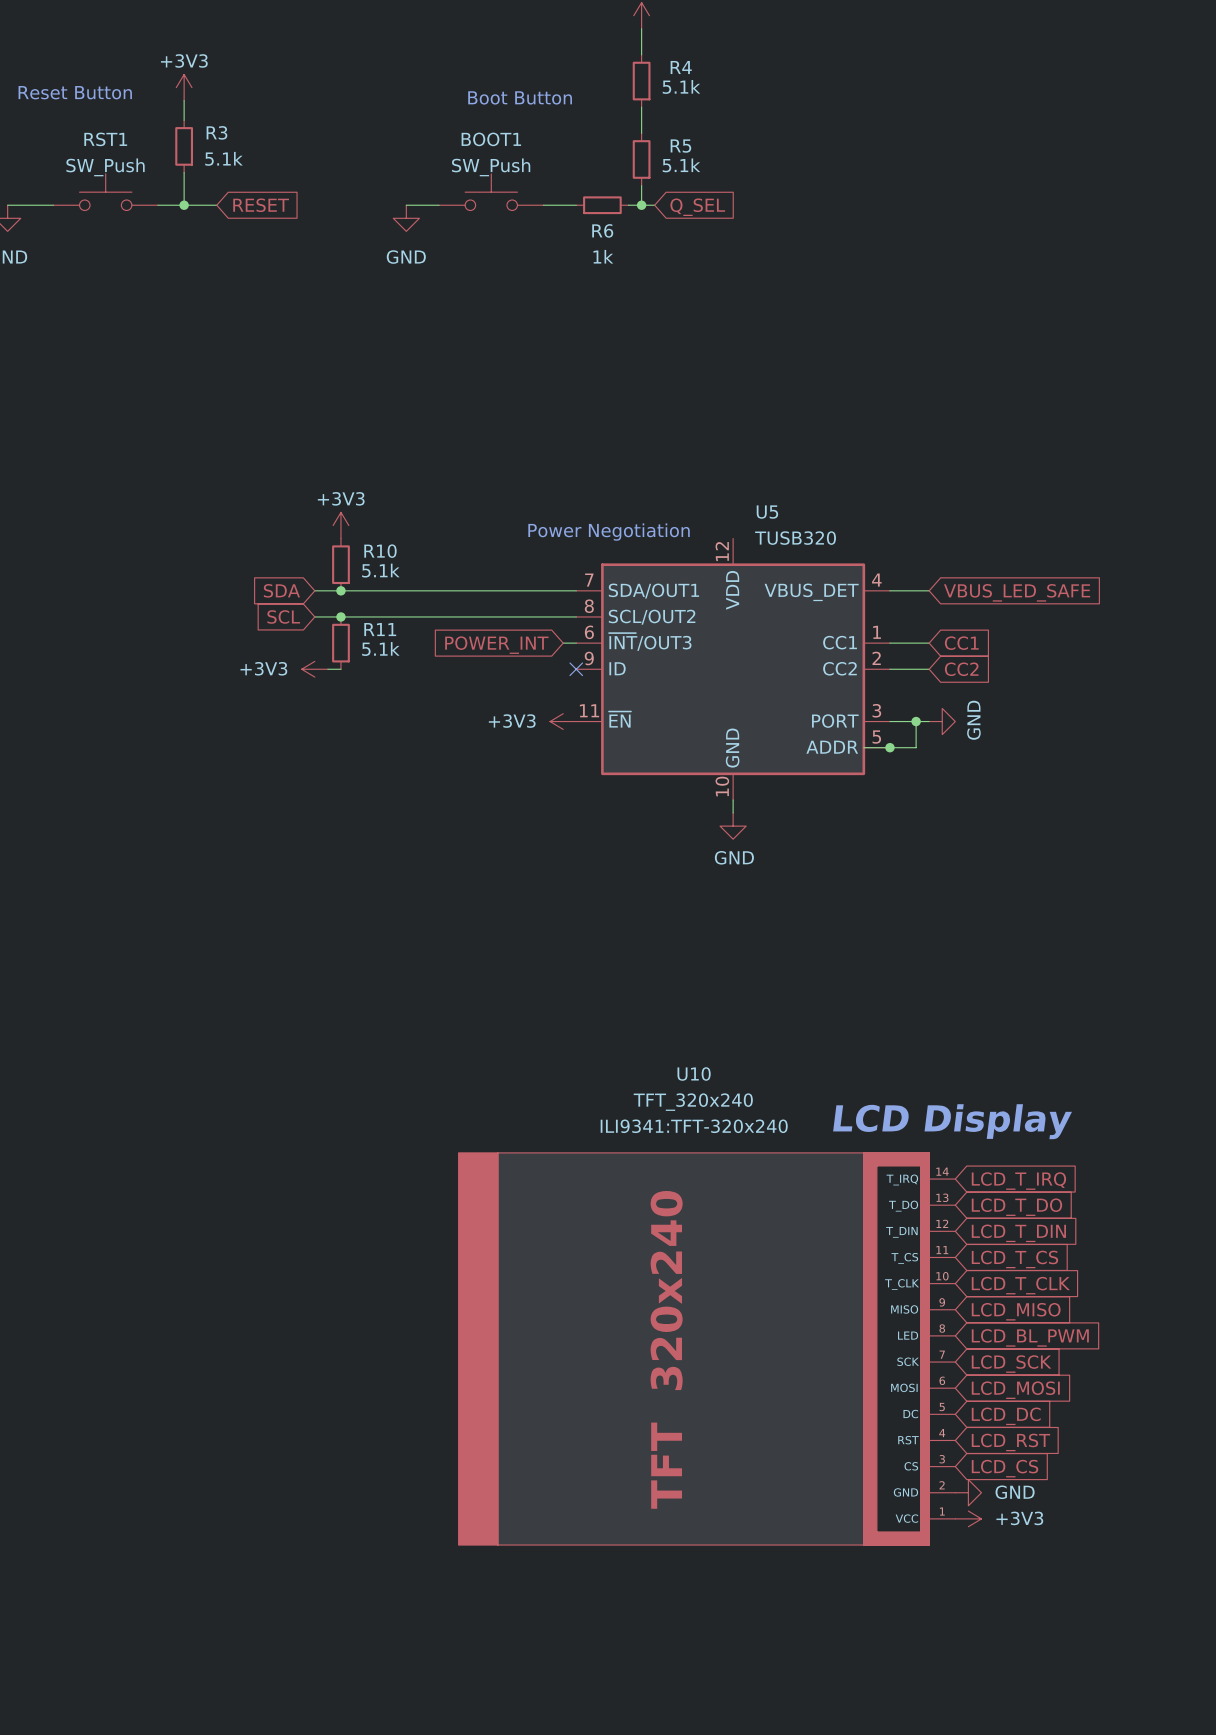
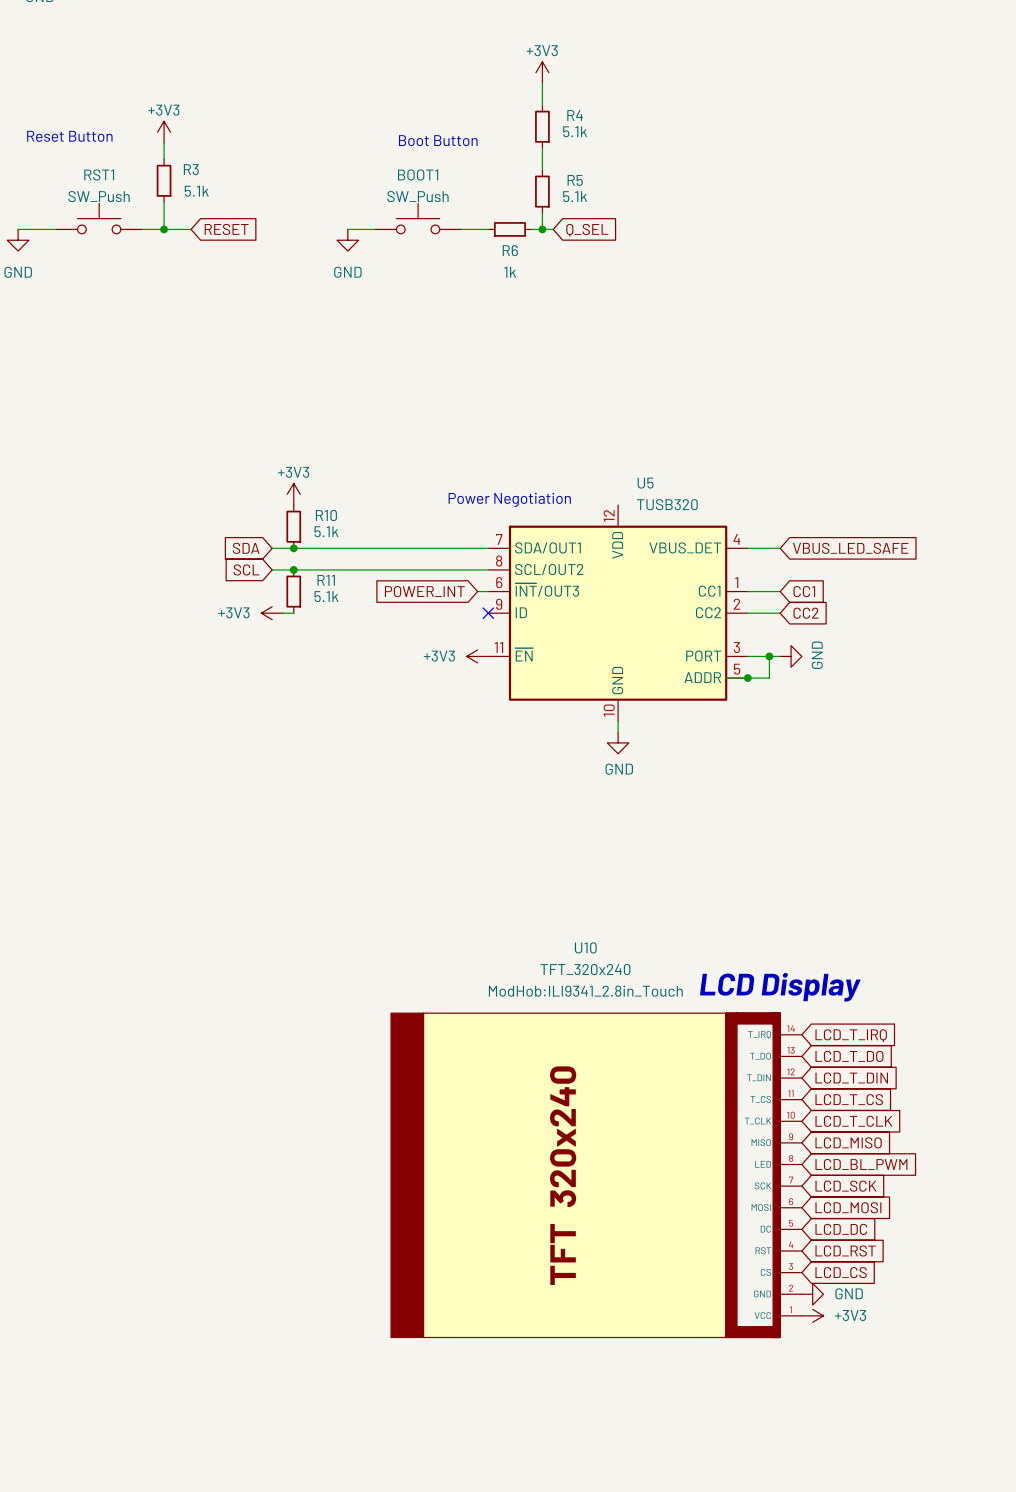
U10 text: ILI9341:TFT-320x240 (694, 1126) -> ModHob:ILI9341_2.8in_Touch (585, 991)

